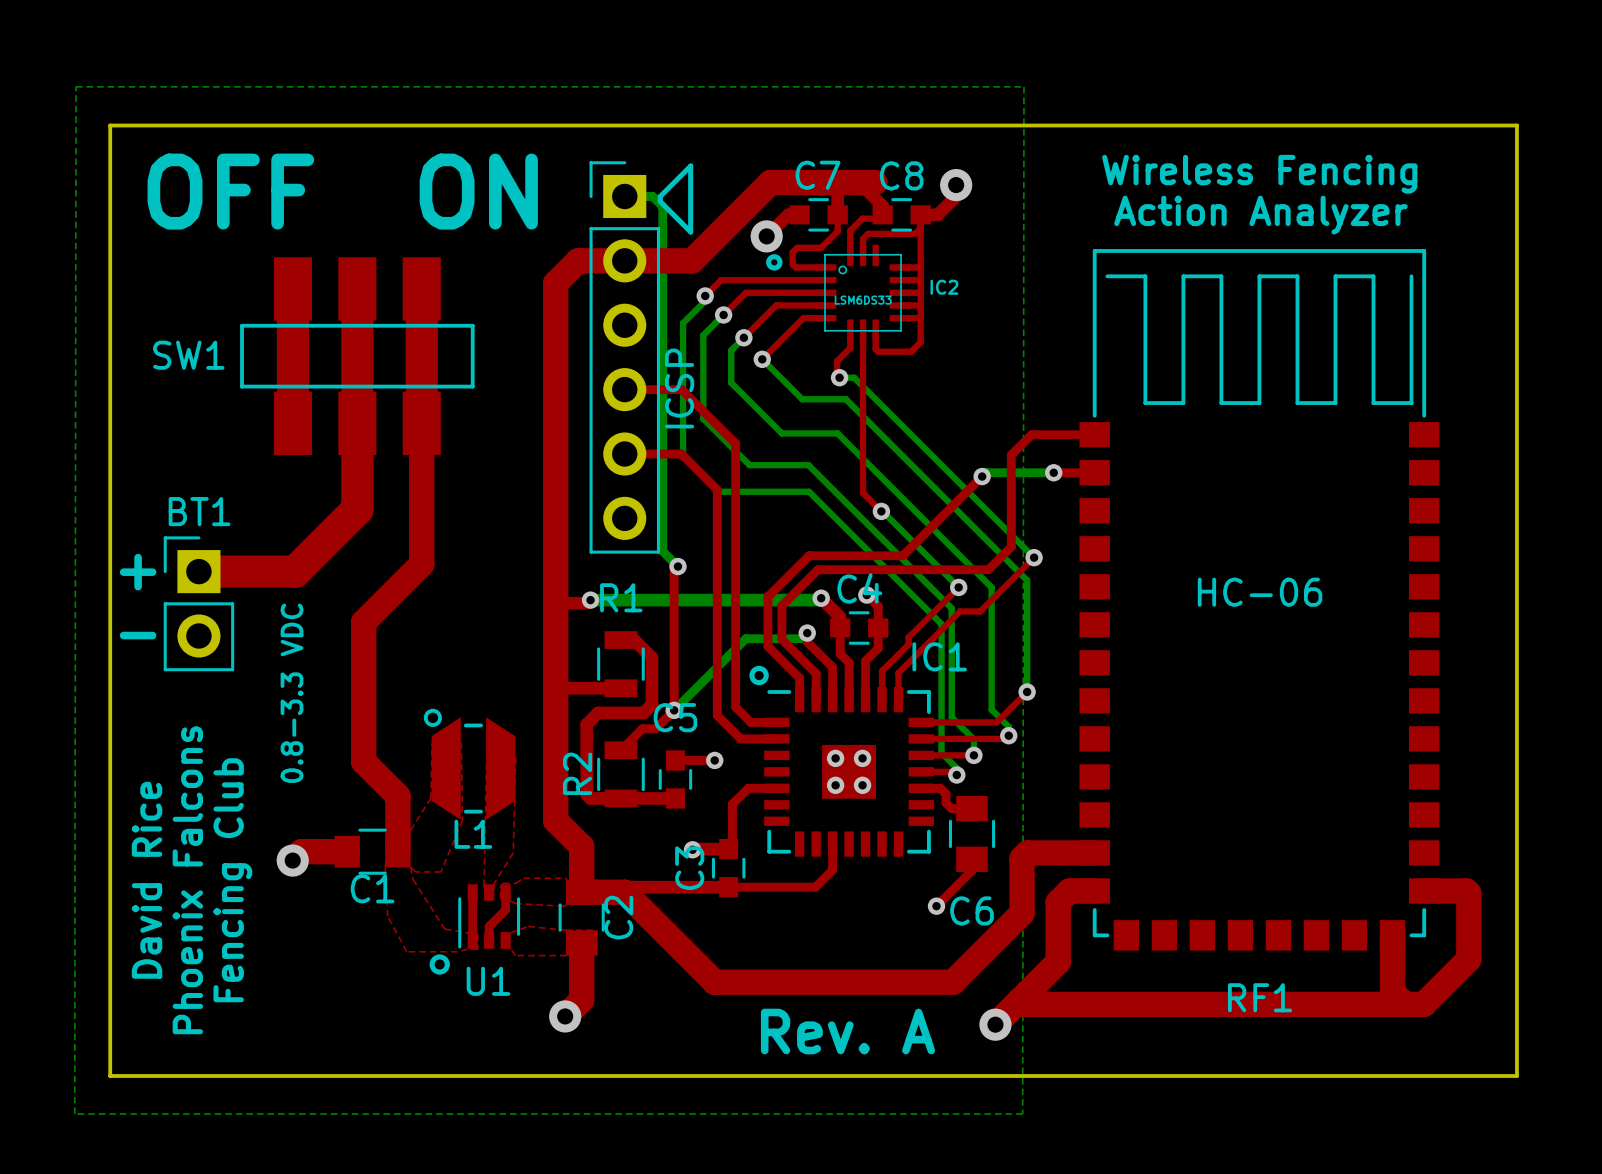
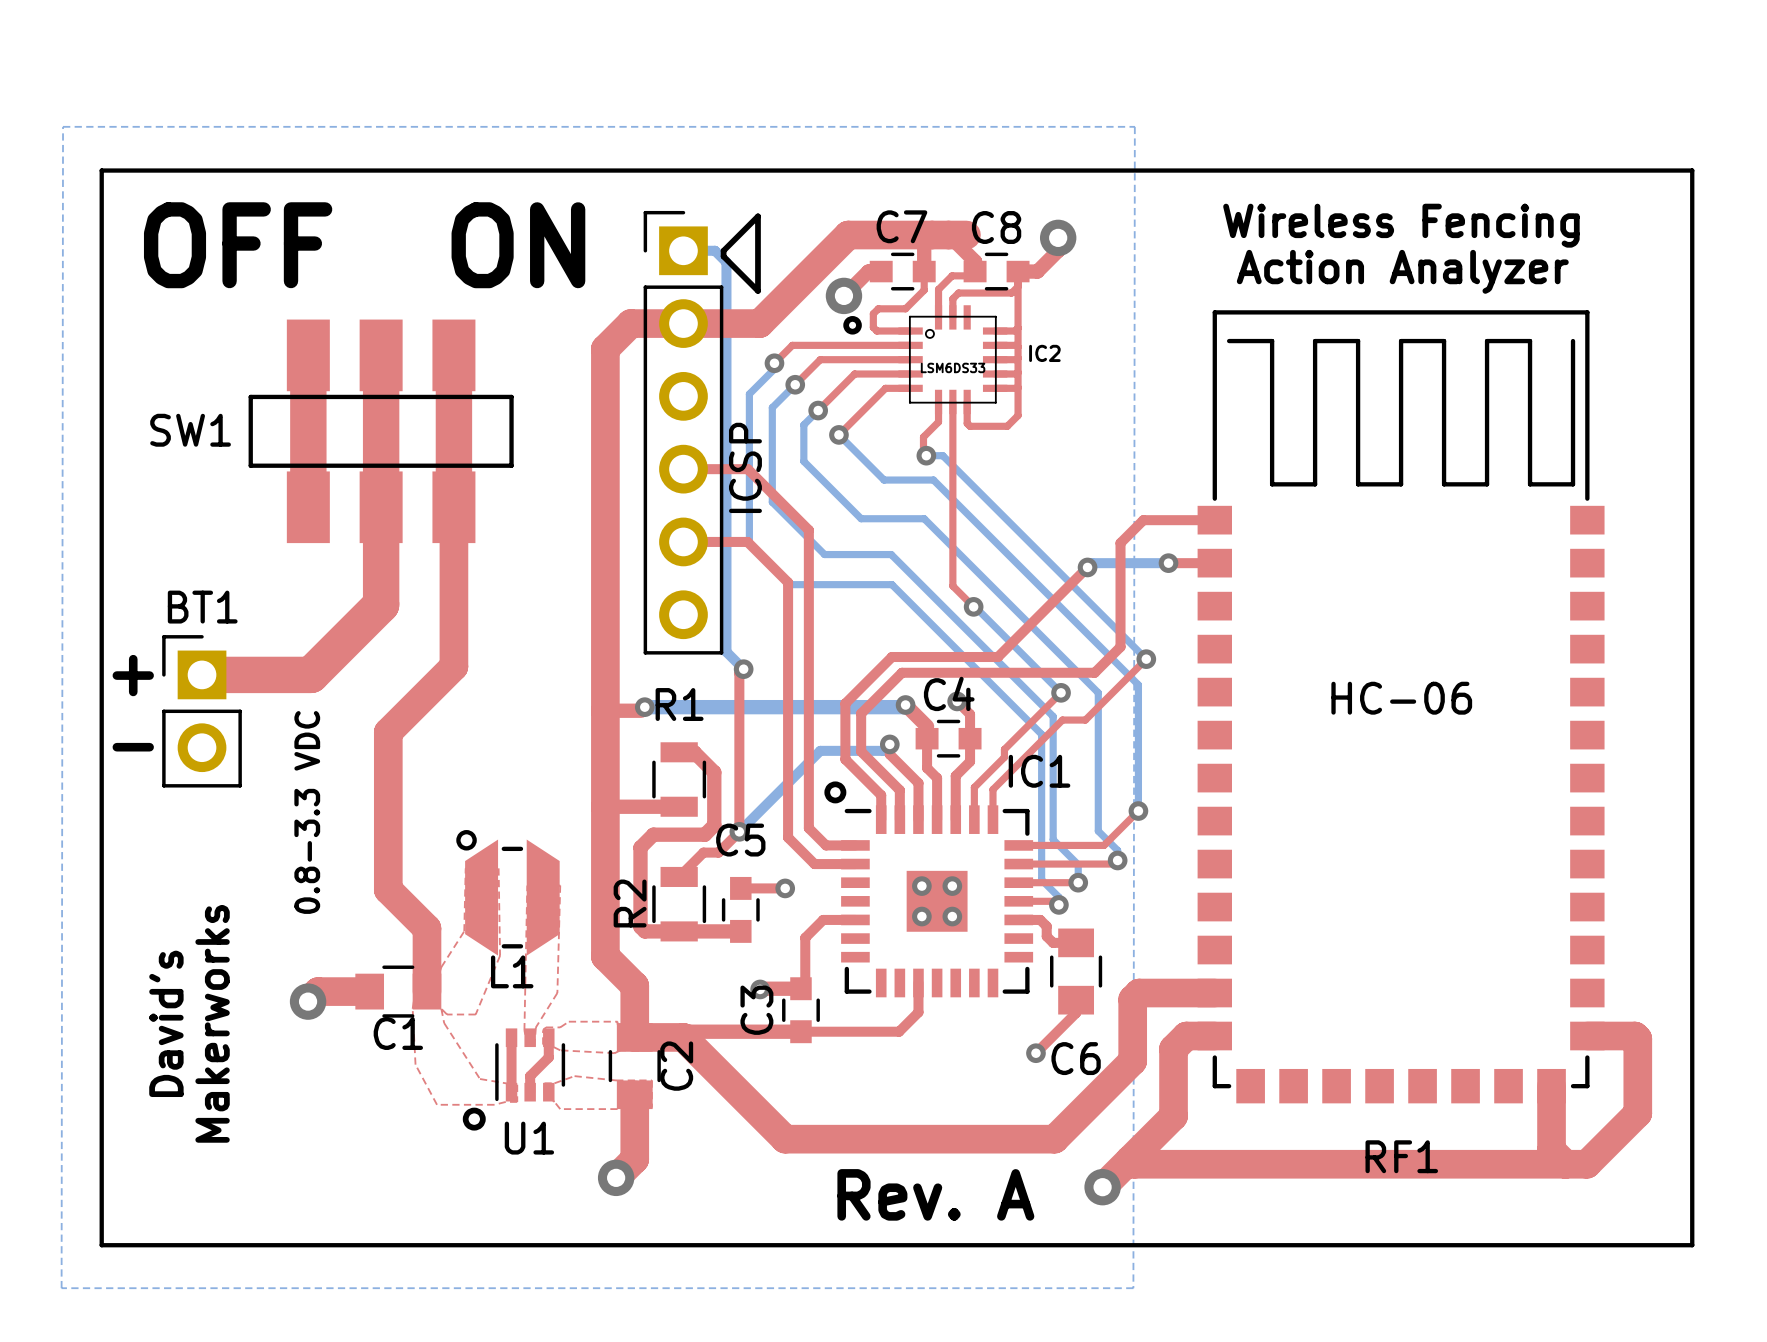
text: David Rice (147, 880) -> none
text: none -> David's (166, 1023)
text: Phoenix Falcons (187, 880) -> none
text: none -> Makerworks (212, 1023)
text: Fencing Club (232, 880) -> none

